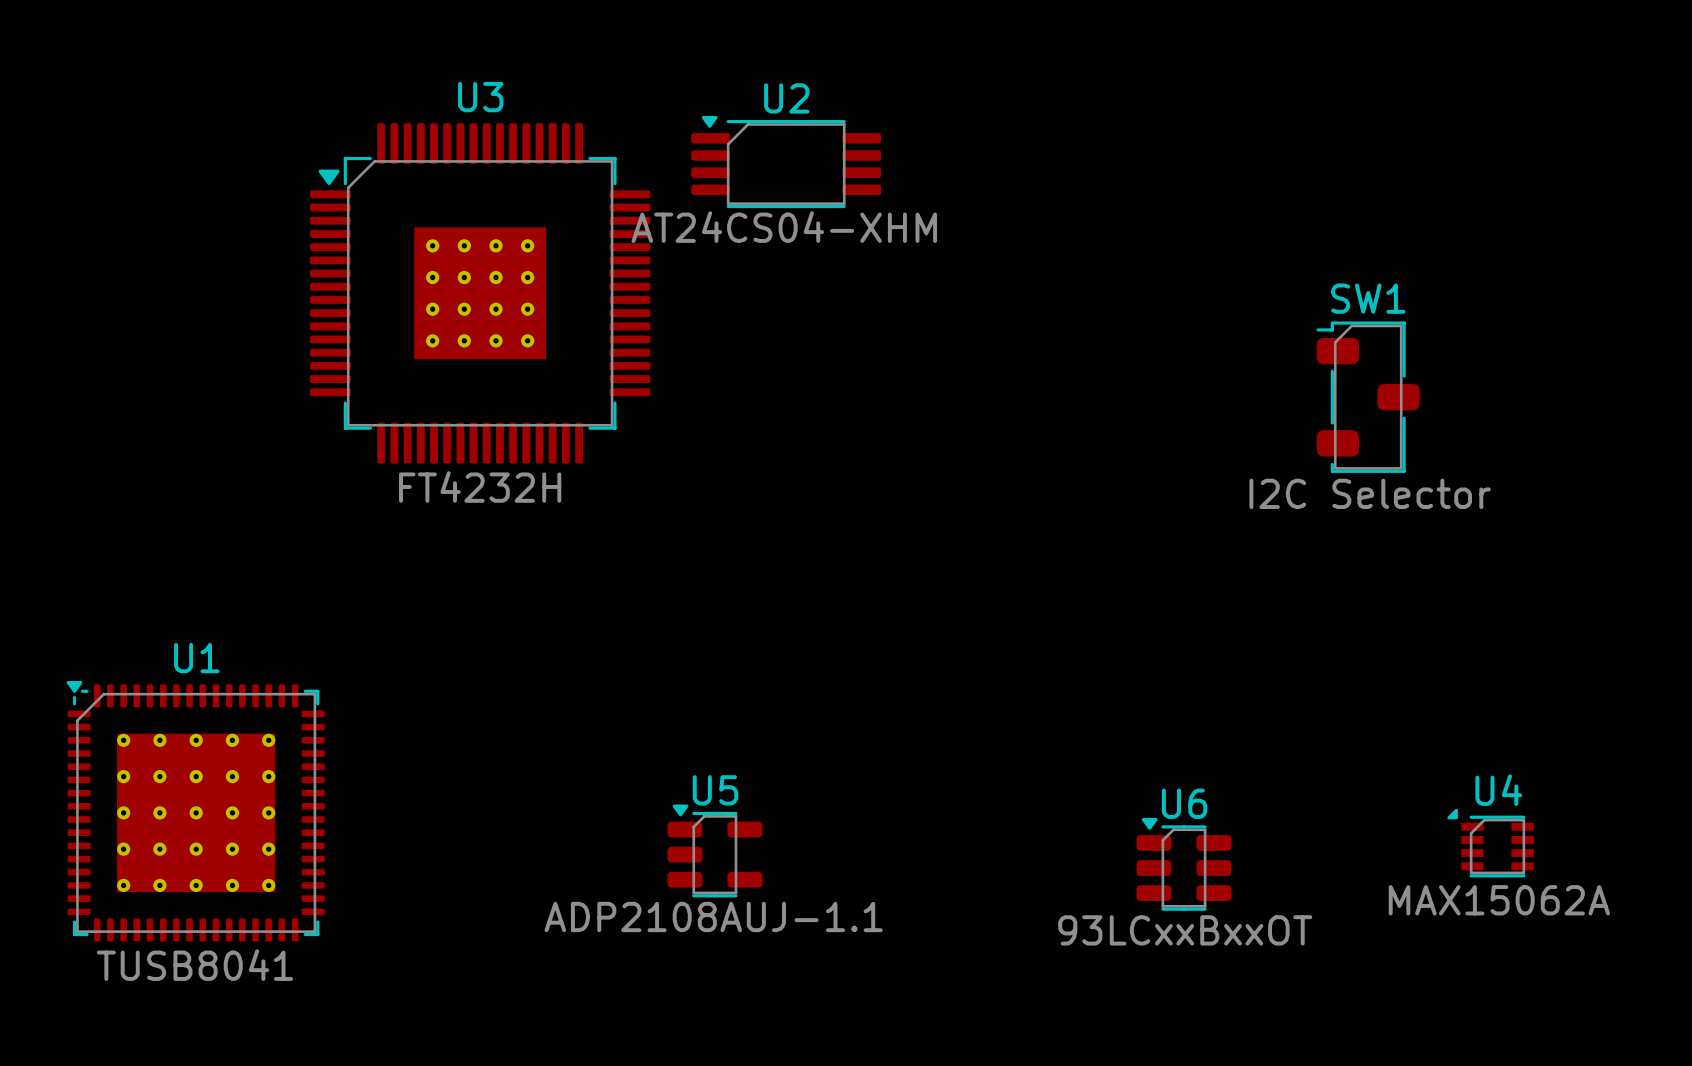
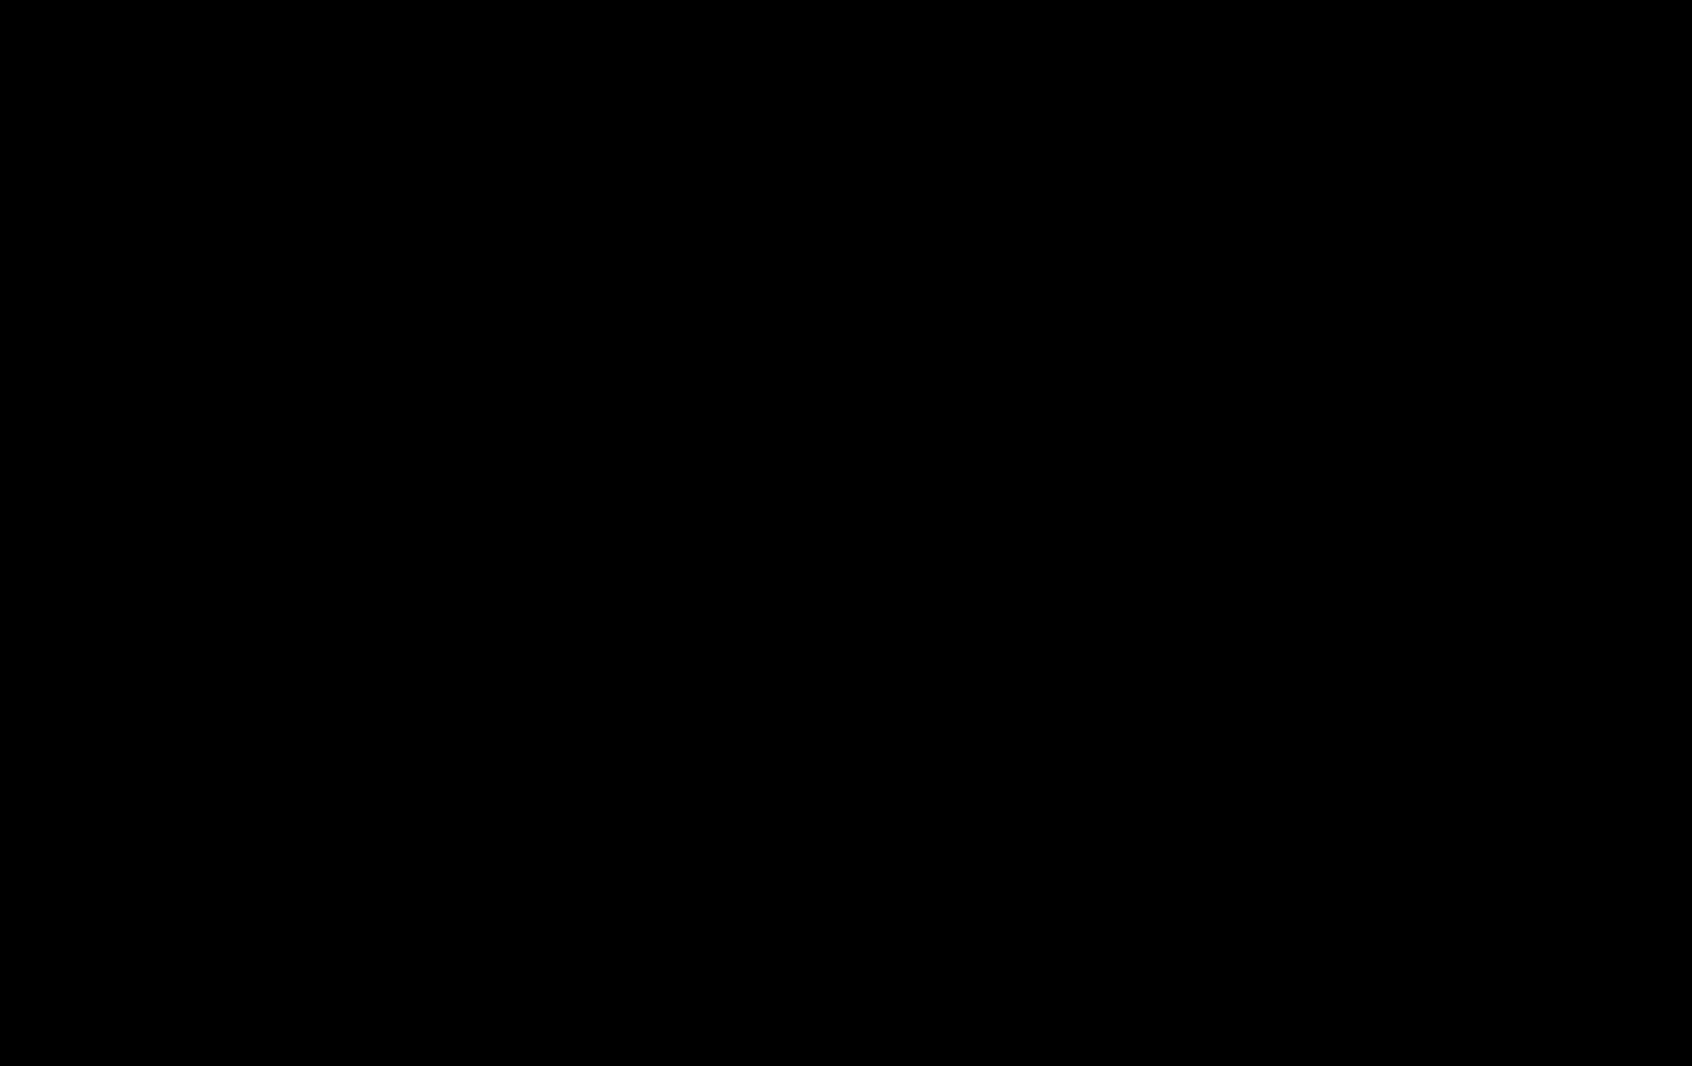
U2: AT24CS04-XHM (786, 162) -> none
U3: FT4232H (480, 293) -> none
SW1: I2C Selector (1368, 397) -> none
U1: TUSB8041 (195, 811) -> none
U4: MAX15062A (1490, 843) -> none
U5: ADP2108AUJ-1.1 (714, 850) -> none
U6: 93LCxxBxxOT (1183, 864) -> none

